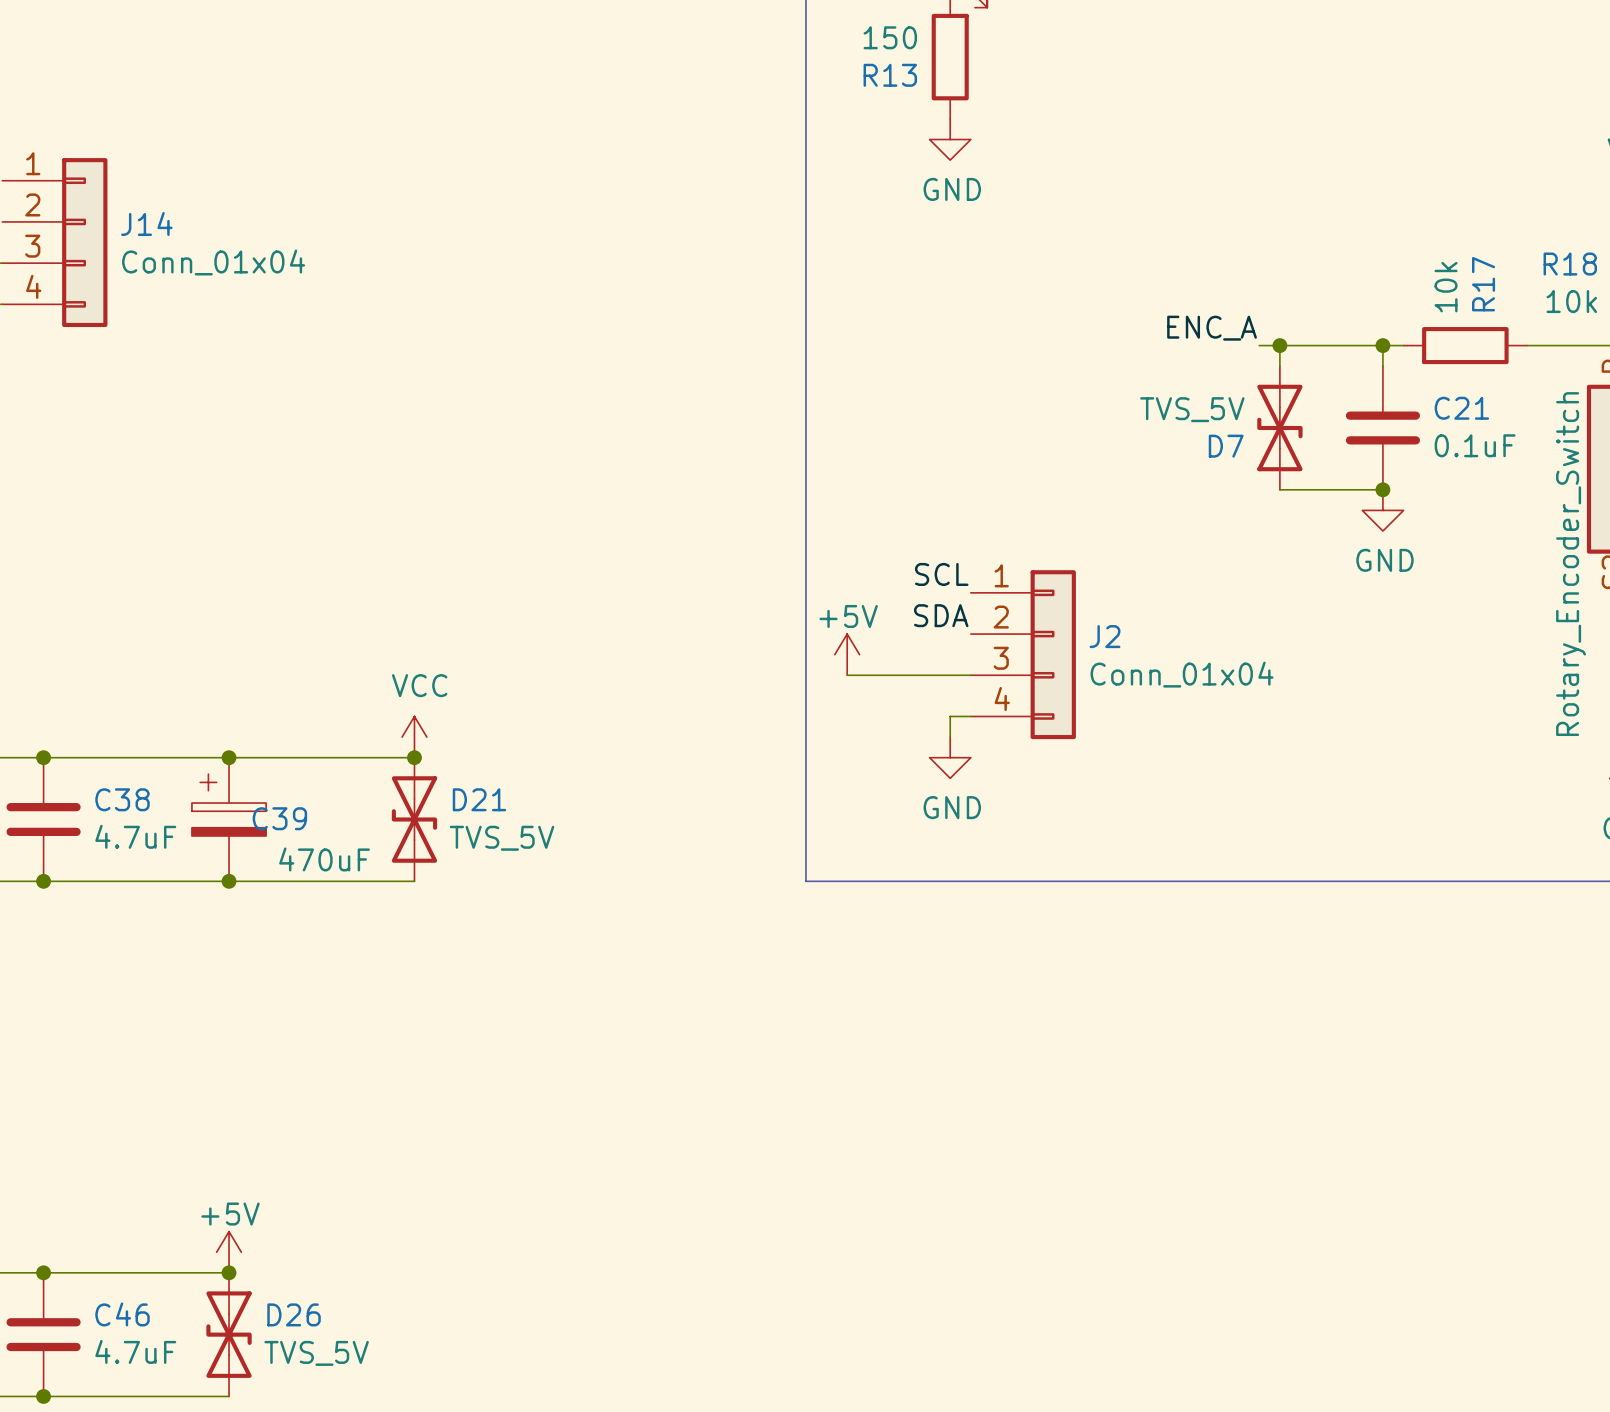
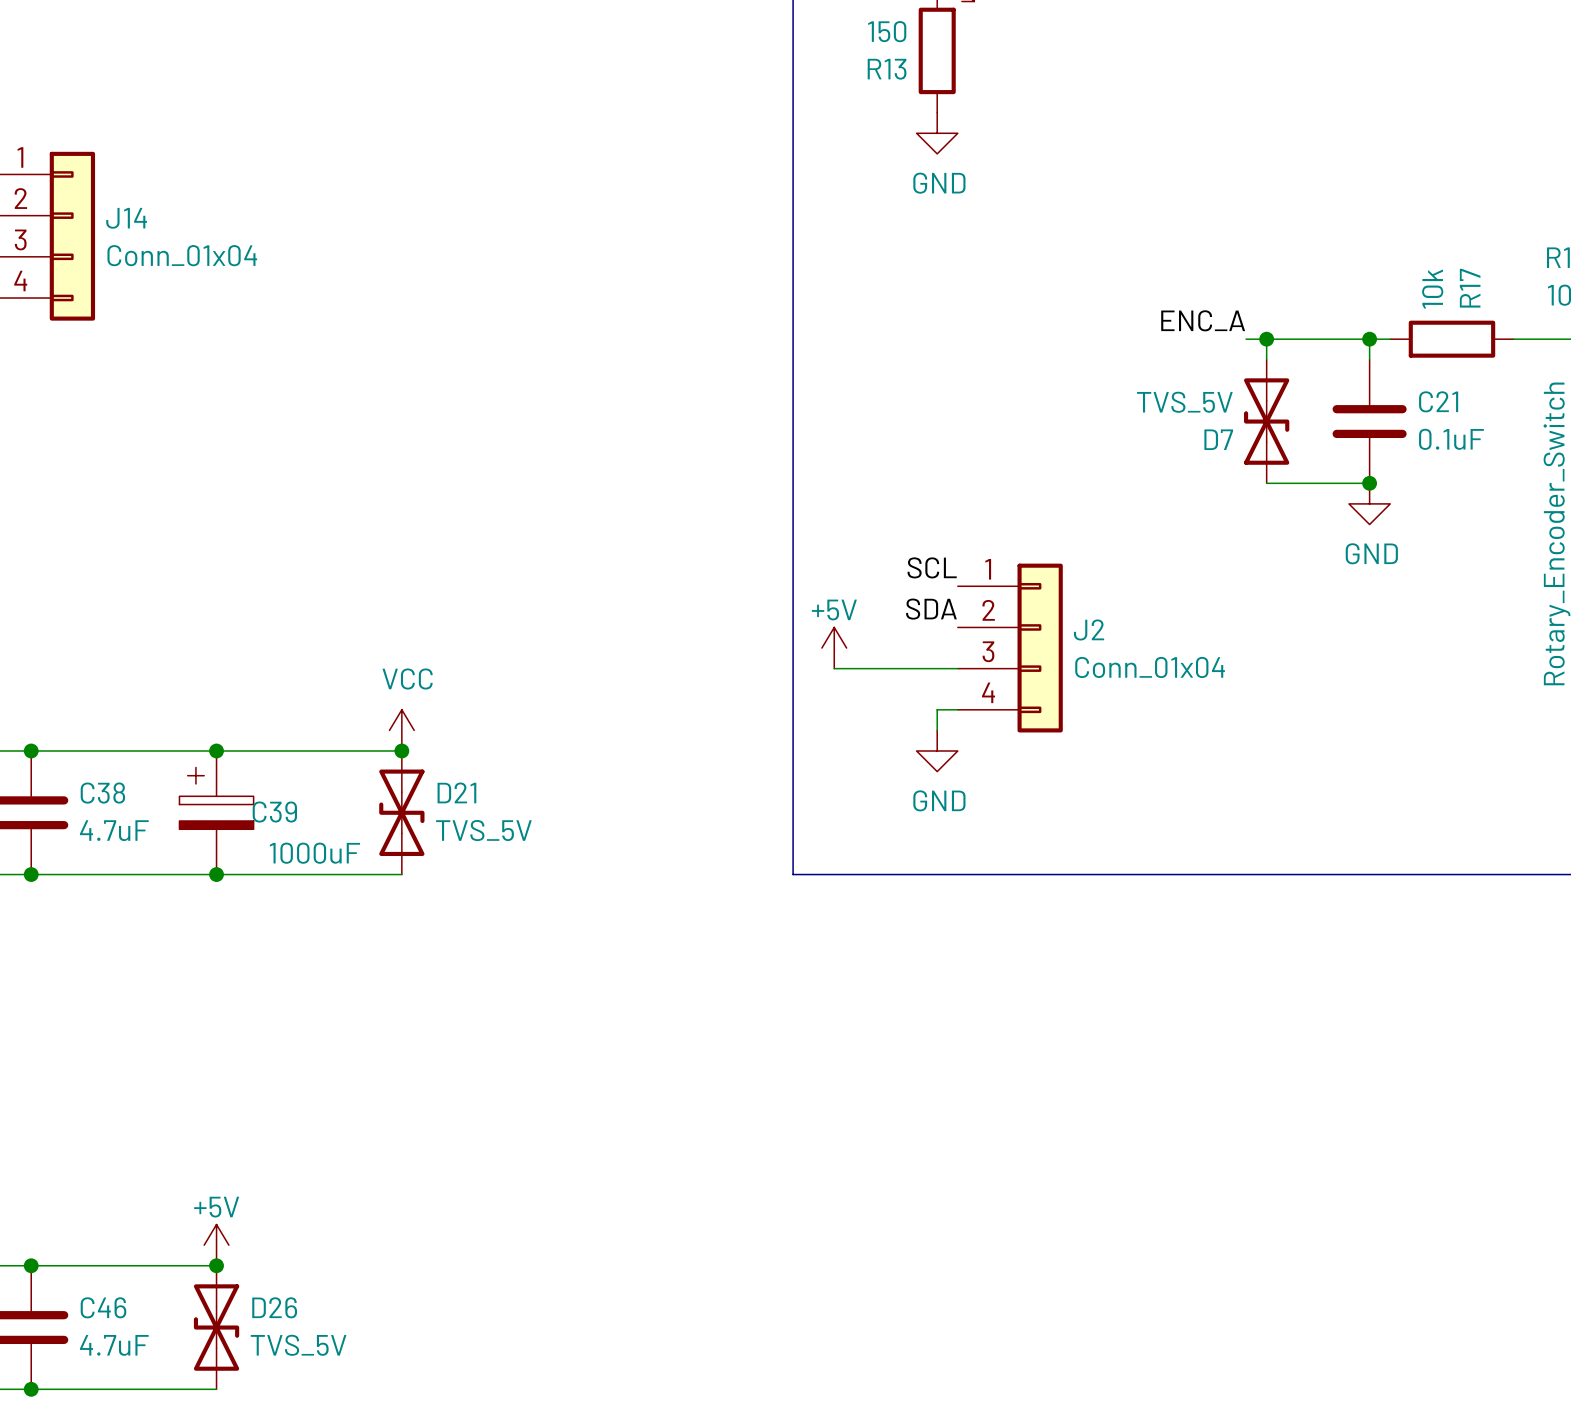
C39 value: 470uF (324, 859) -> 1000uF (314, 853)

